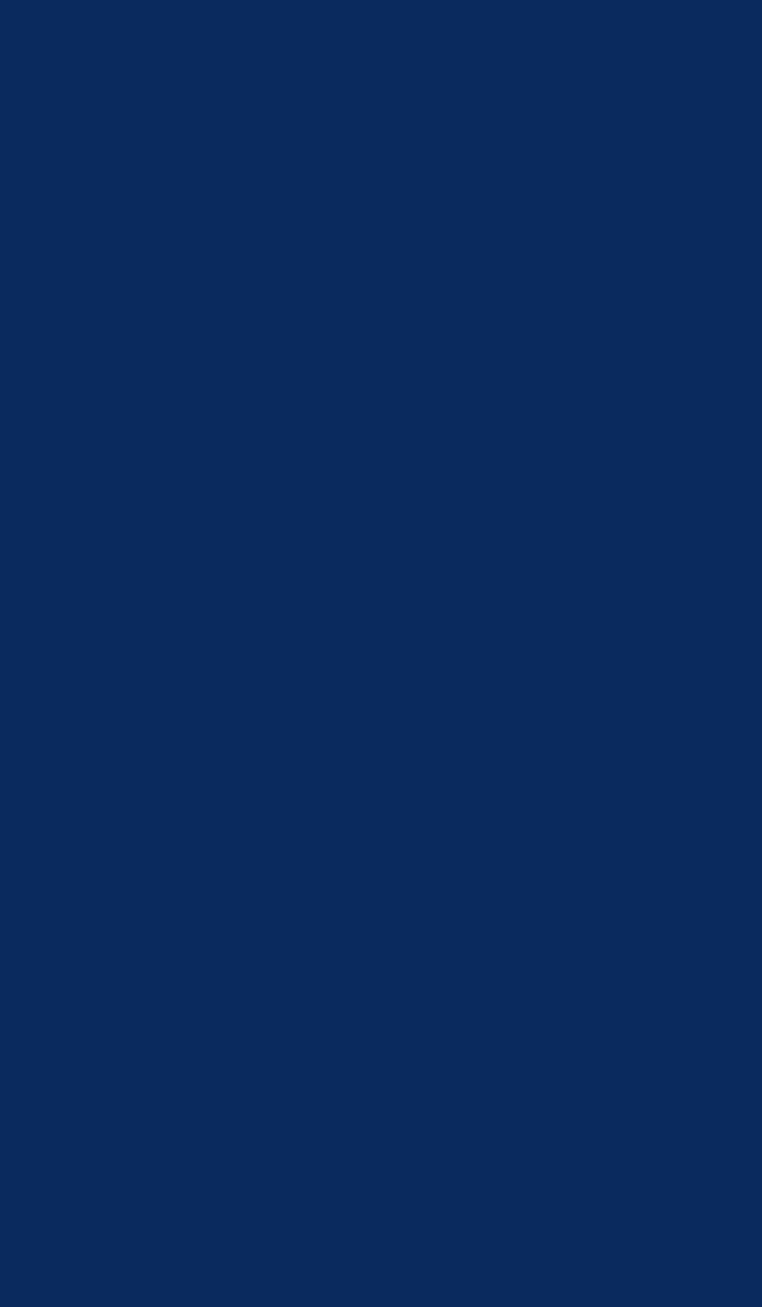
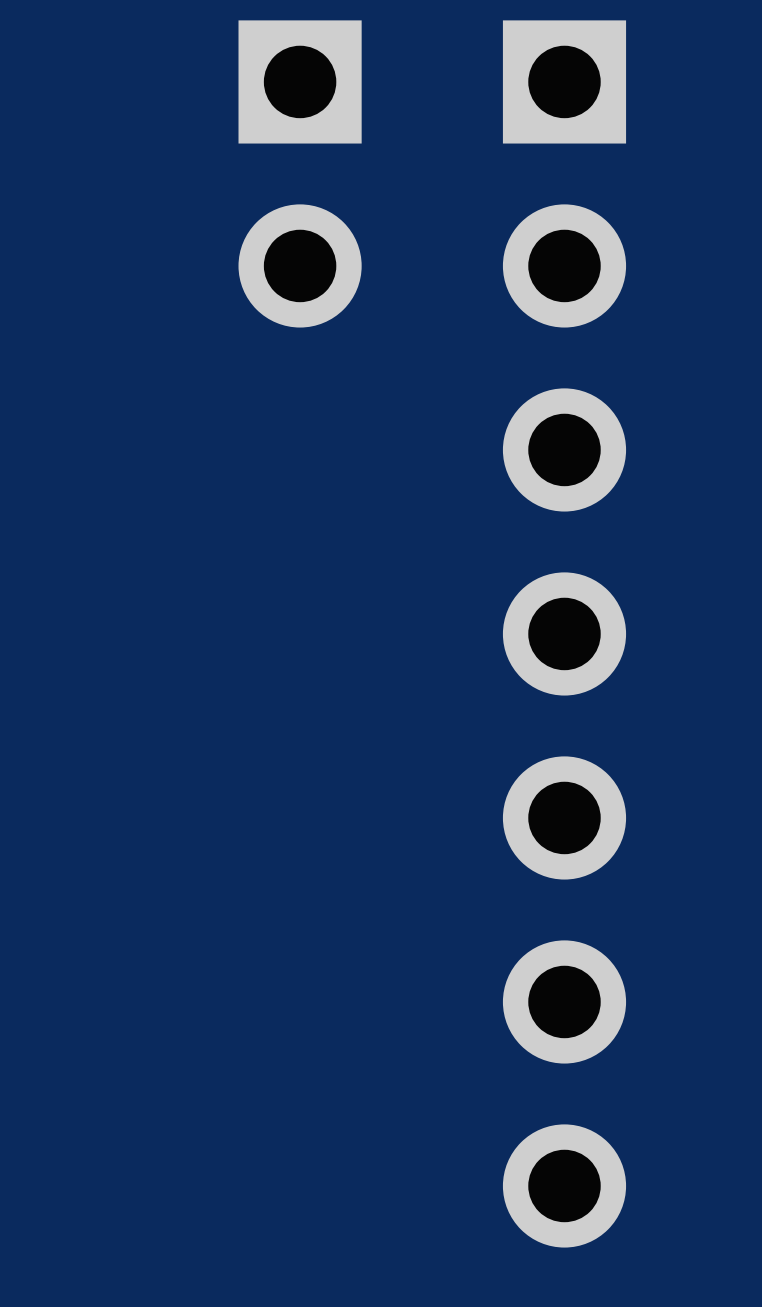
part: none -> (300, 173)
part: none -> (564, 633)

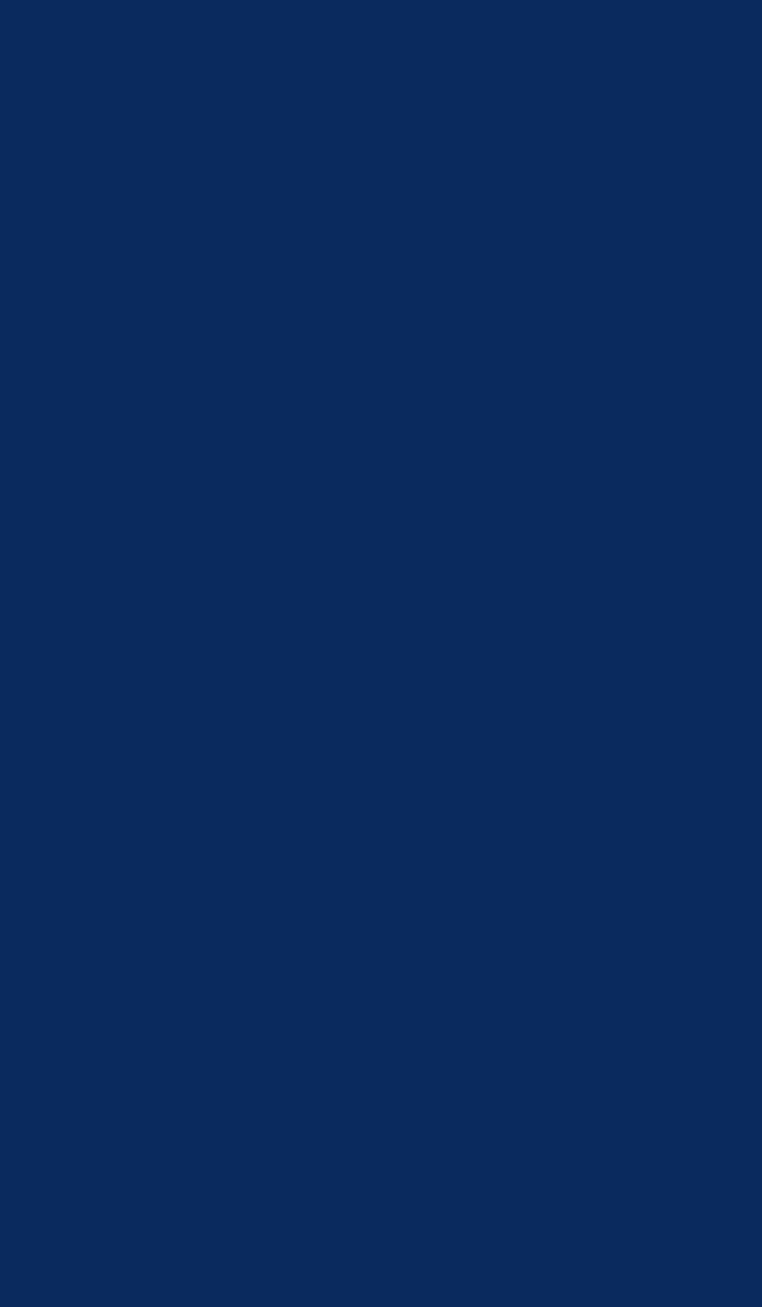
part: (300, 173) -> none
part: (564, 633) -> none

